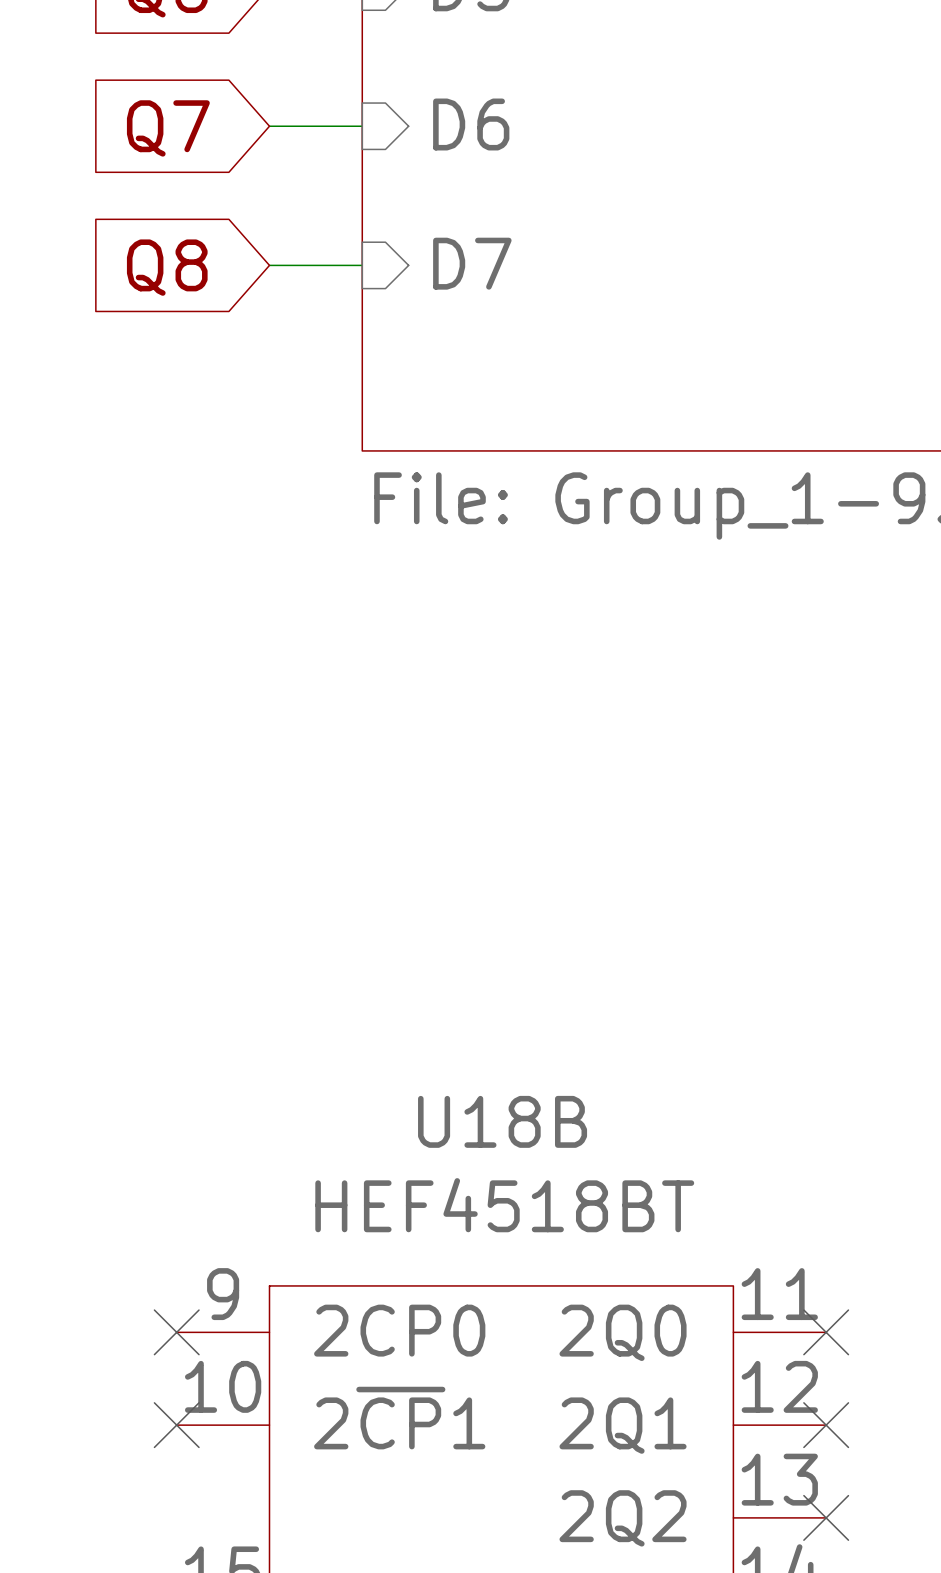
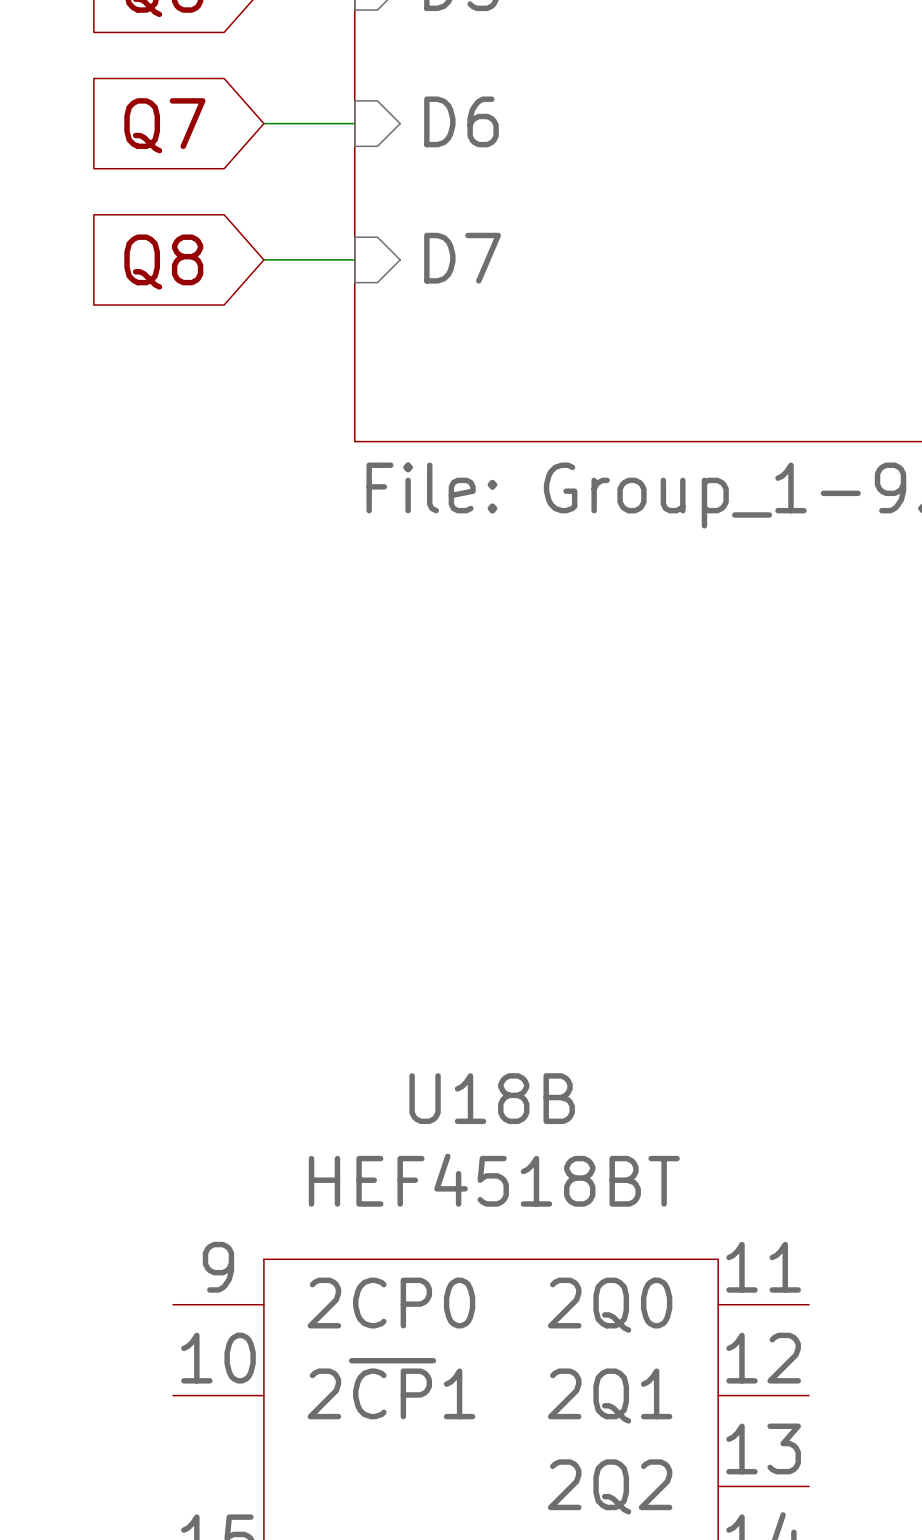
no-connect mark: (176, 1332) -> none
no-connect mark: (826, 1332) -> none
no-connect mark: (176, 1425) -> none
no-connect mark: (826, 1425) -> none
no-connect mark: (826, 1517) -> none

